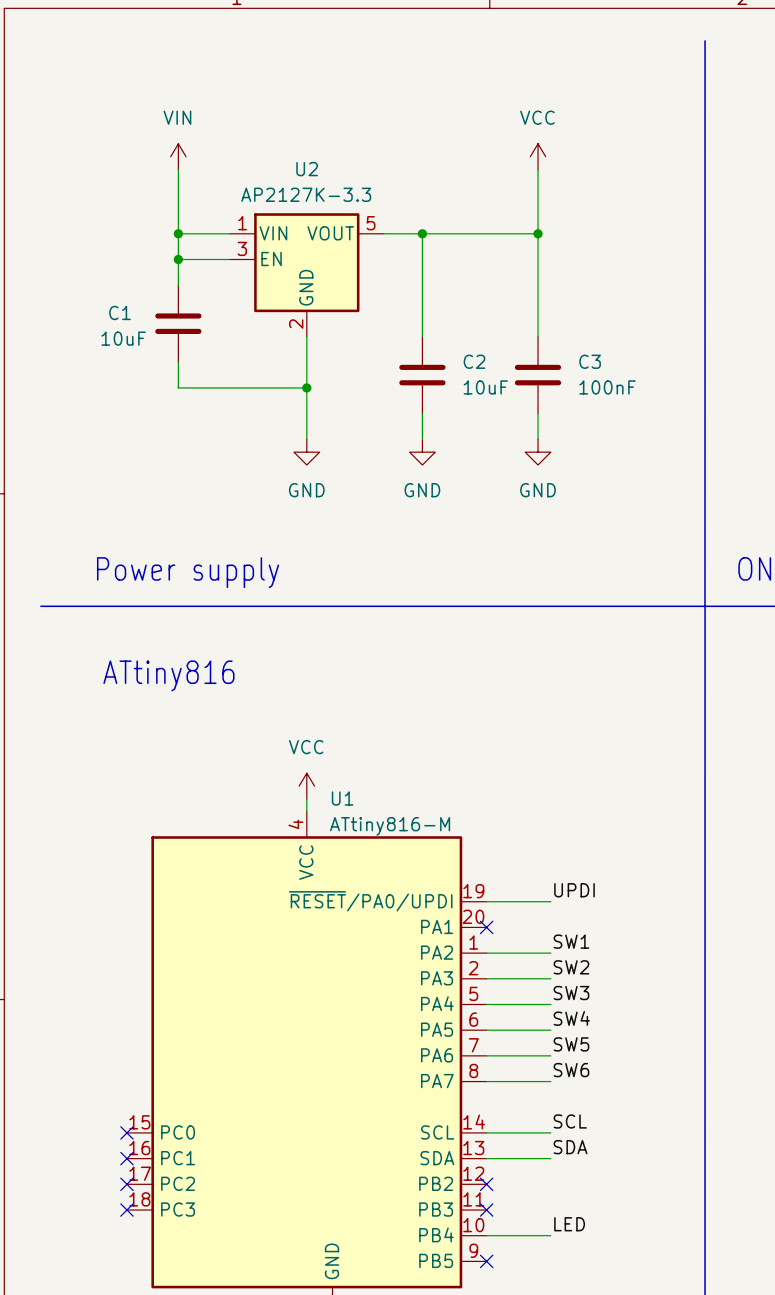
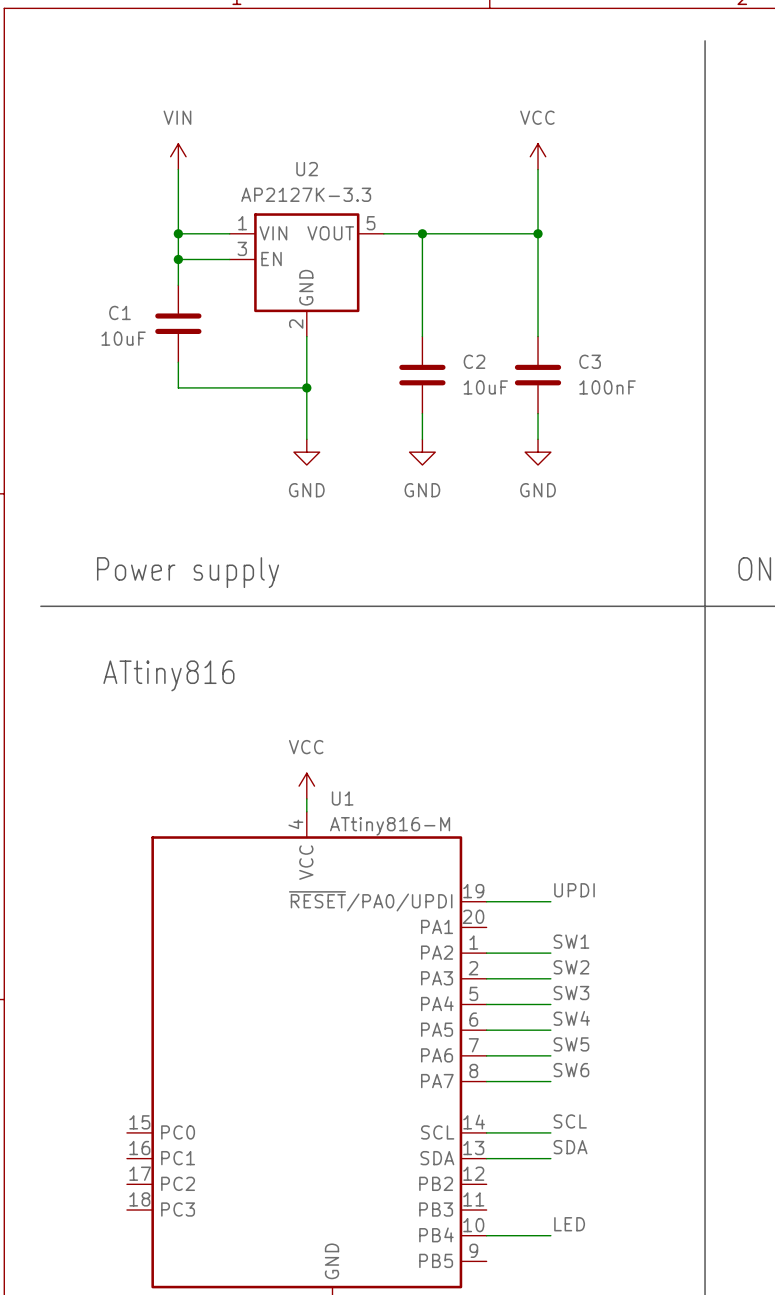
no-connect mark: (486, 927) -> none
no-connect mark: (126, 1132) -> none
no-connect mark: (126, 1158) -> none
no-connect mark: (126, 1184) -> none
no-connect mark: (486, 1184) -> none
no-connect mark: (126, 1210) -> none
no-connect mark: (486, 1210) -> none
no-connect mark: (486, 1261) -> none

